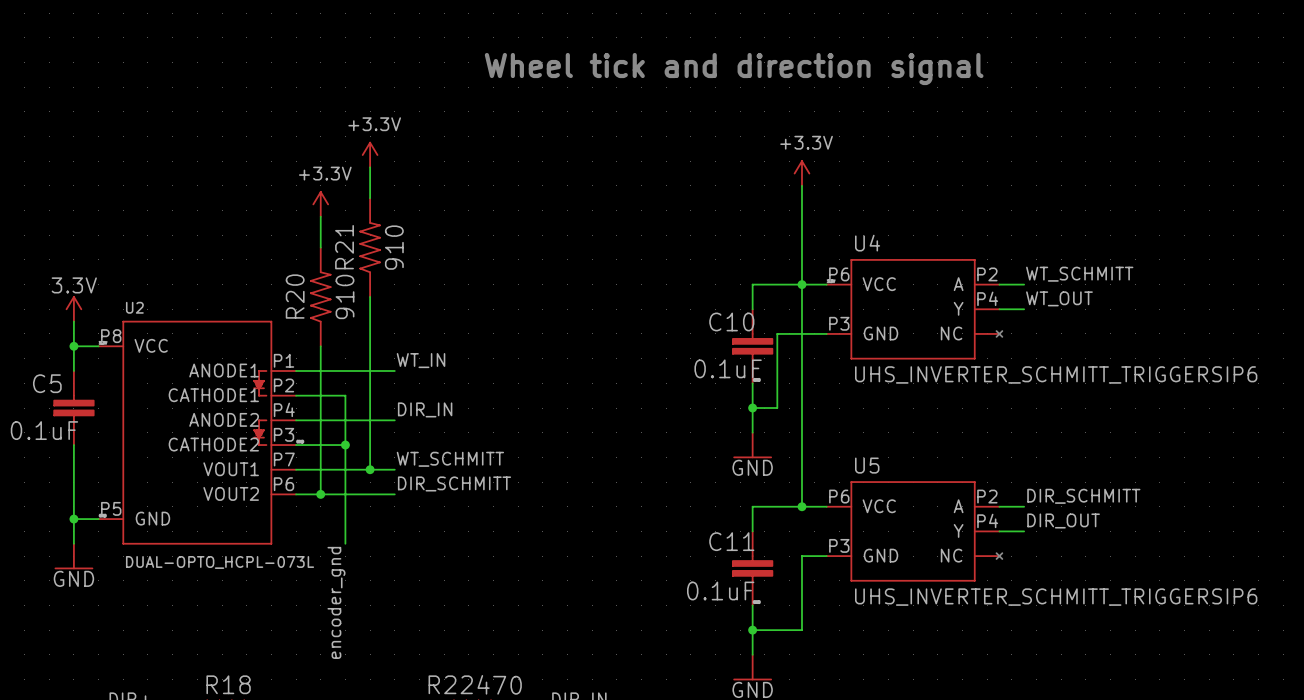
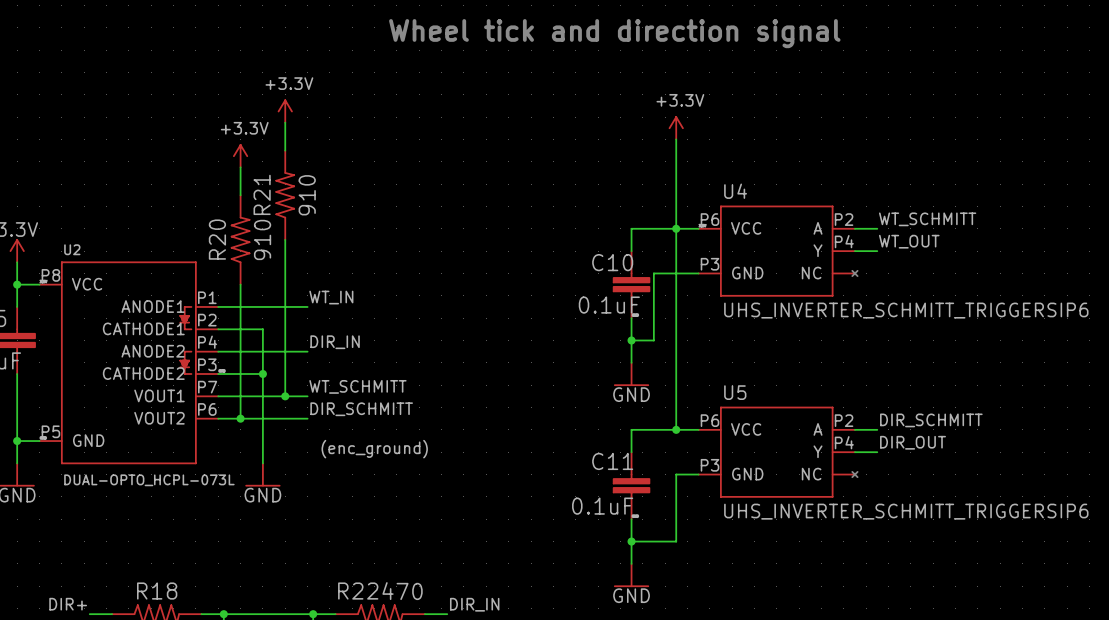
label: none -> (enc_ground) (374, 449)
power symbol: none -> GND (262, 474)
label: encoder_gnd (336, 602) -> none

